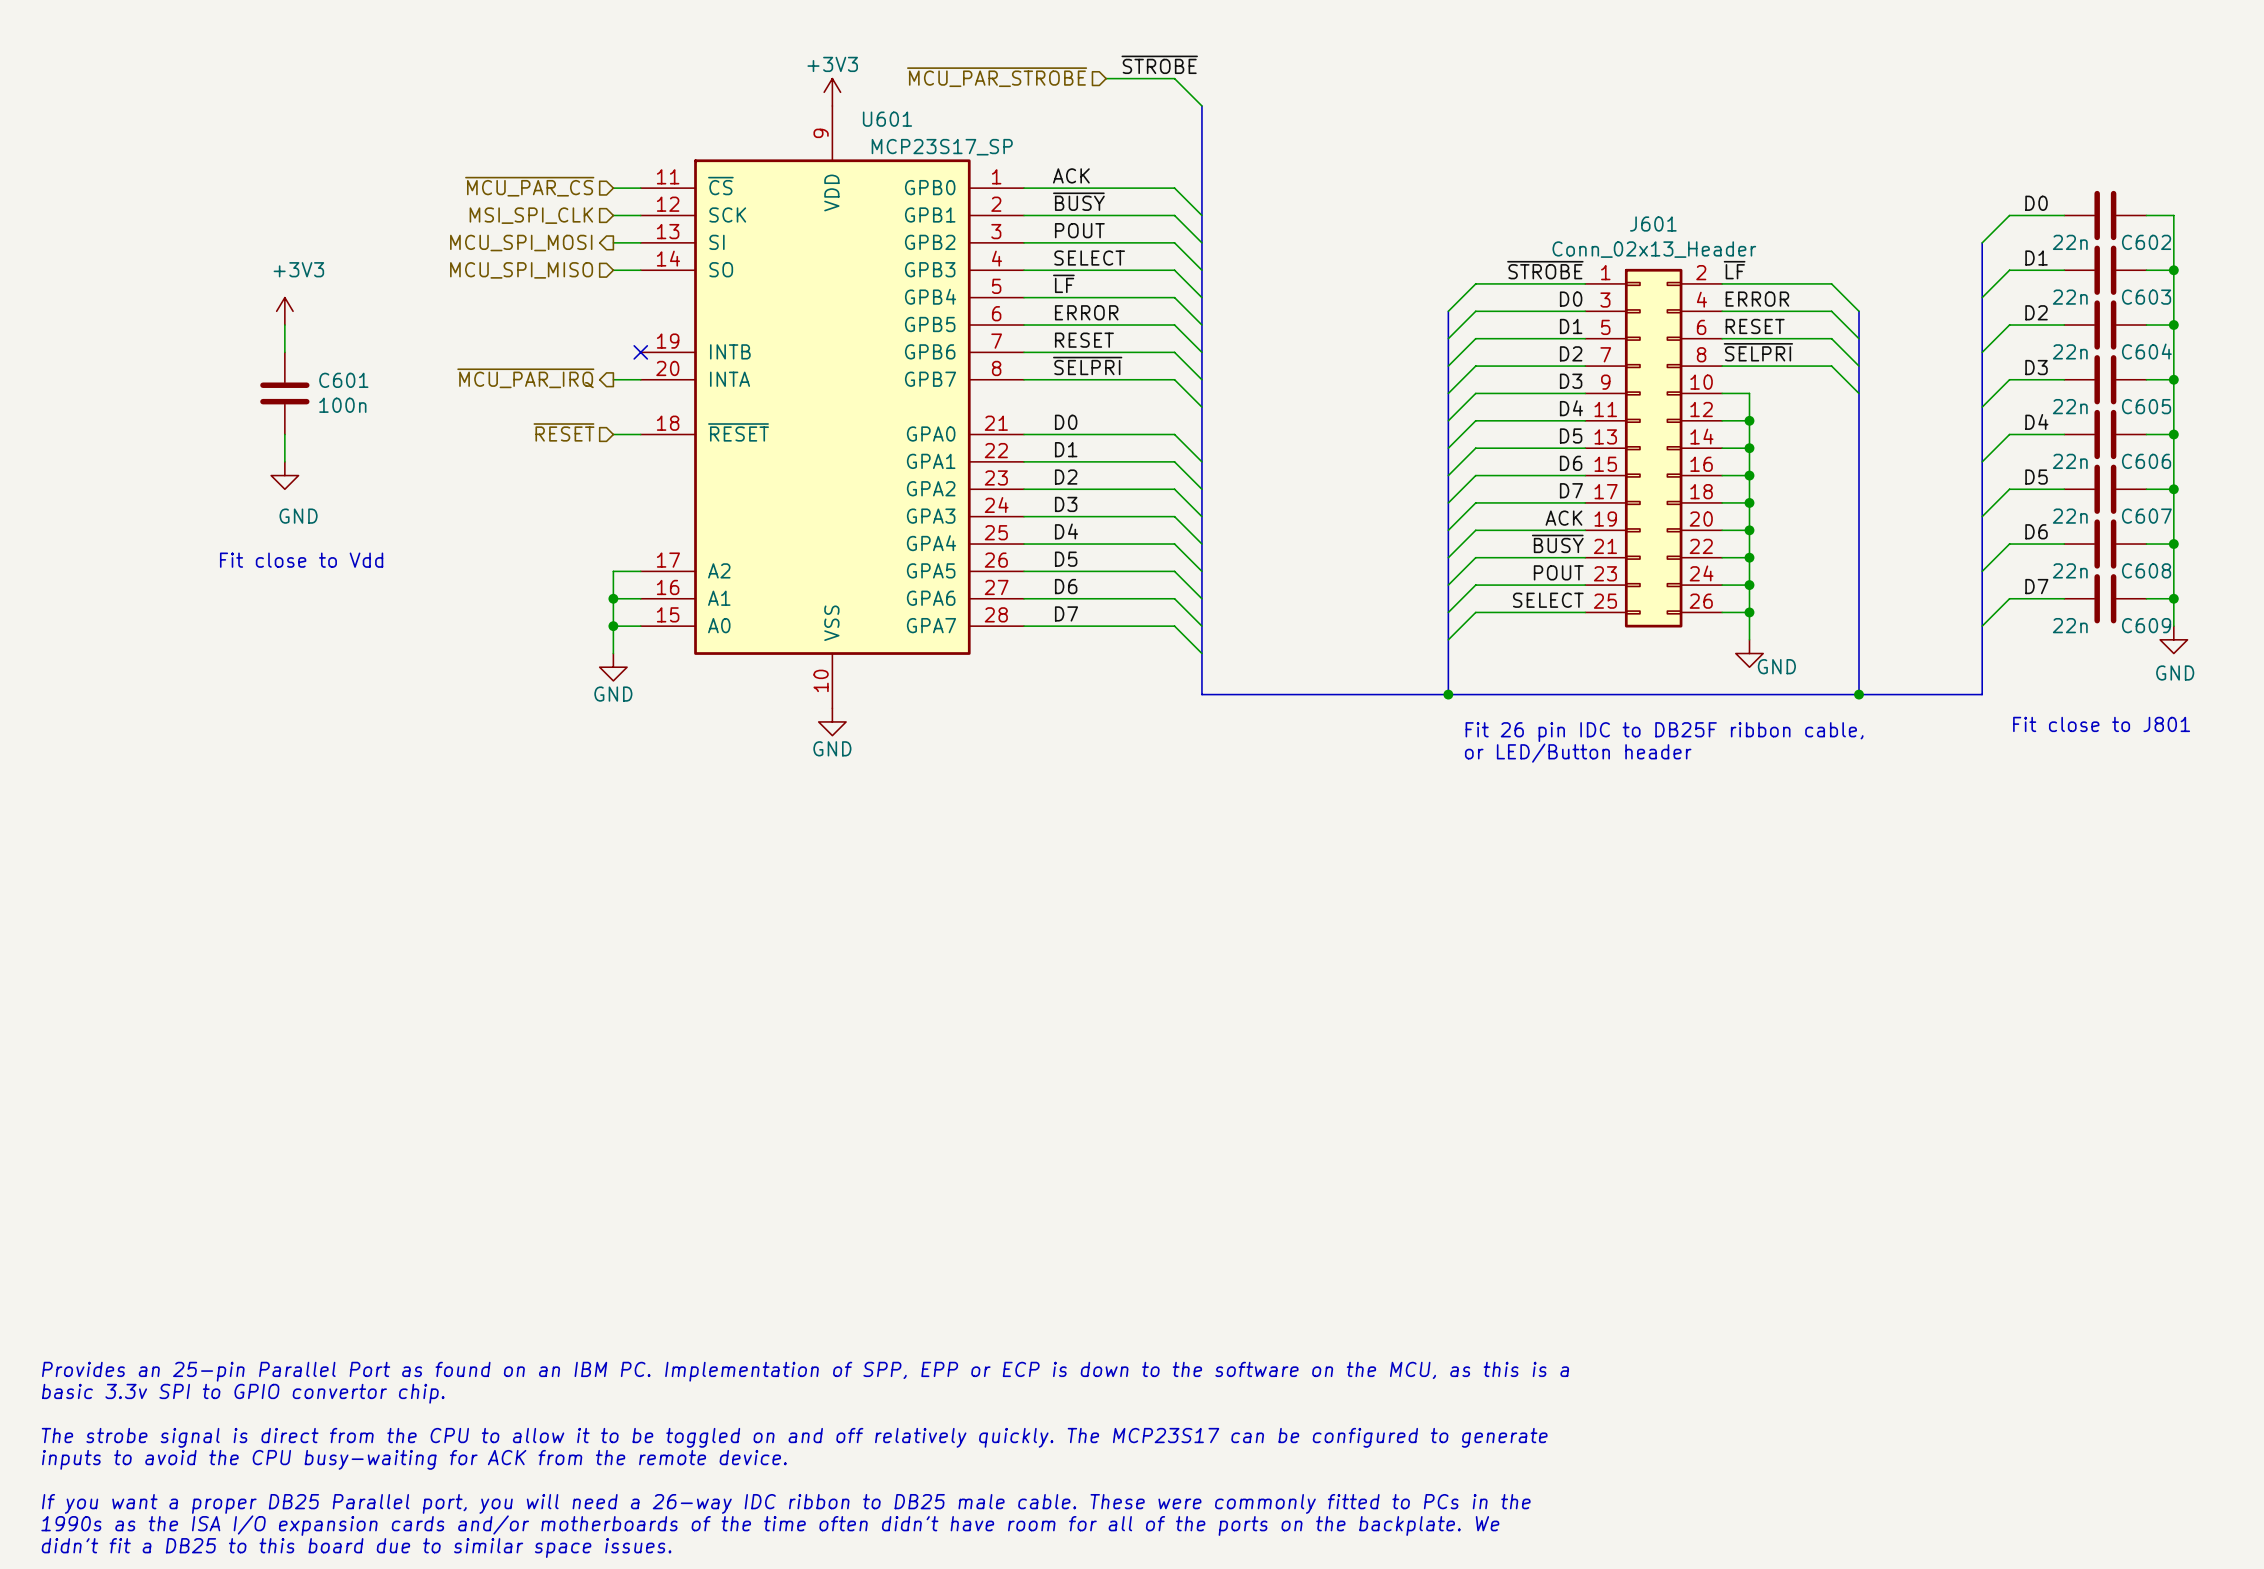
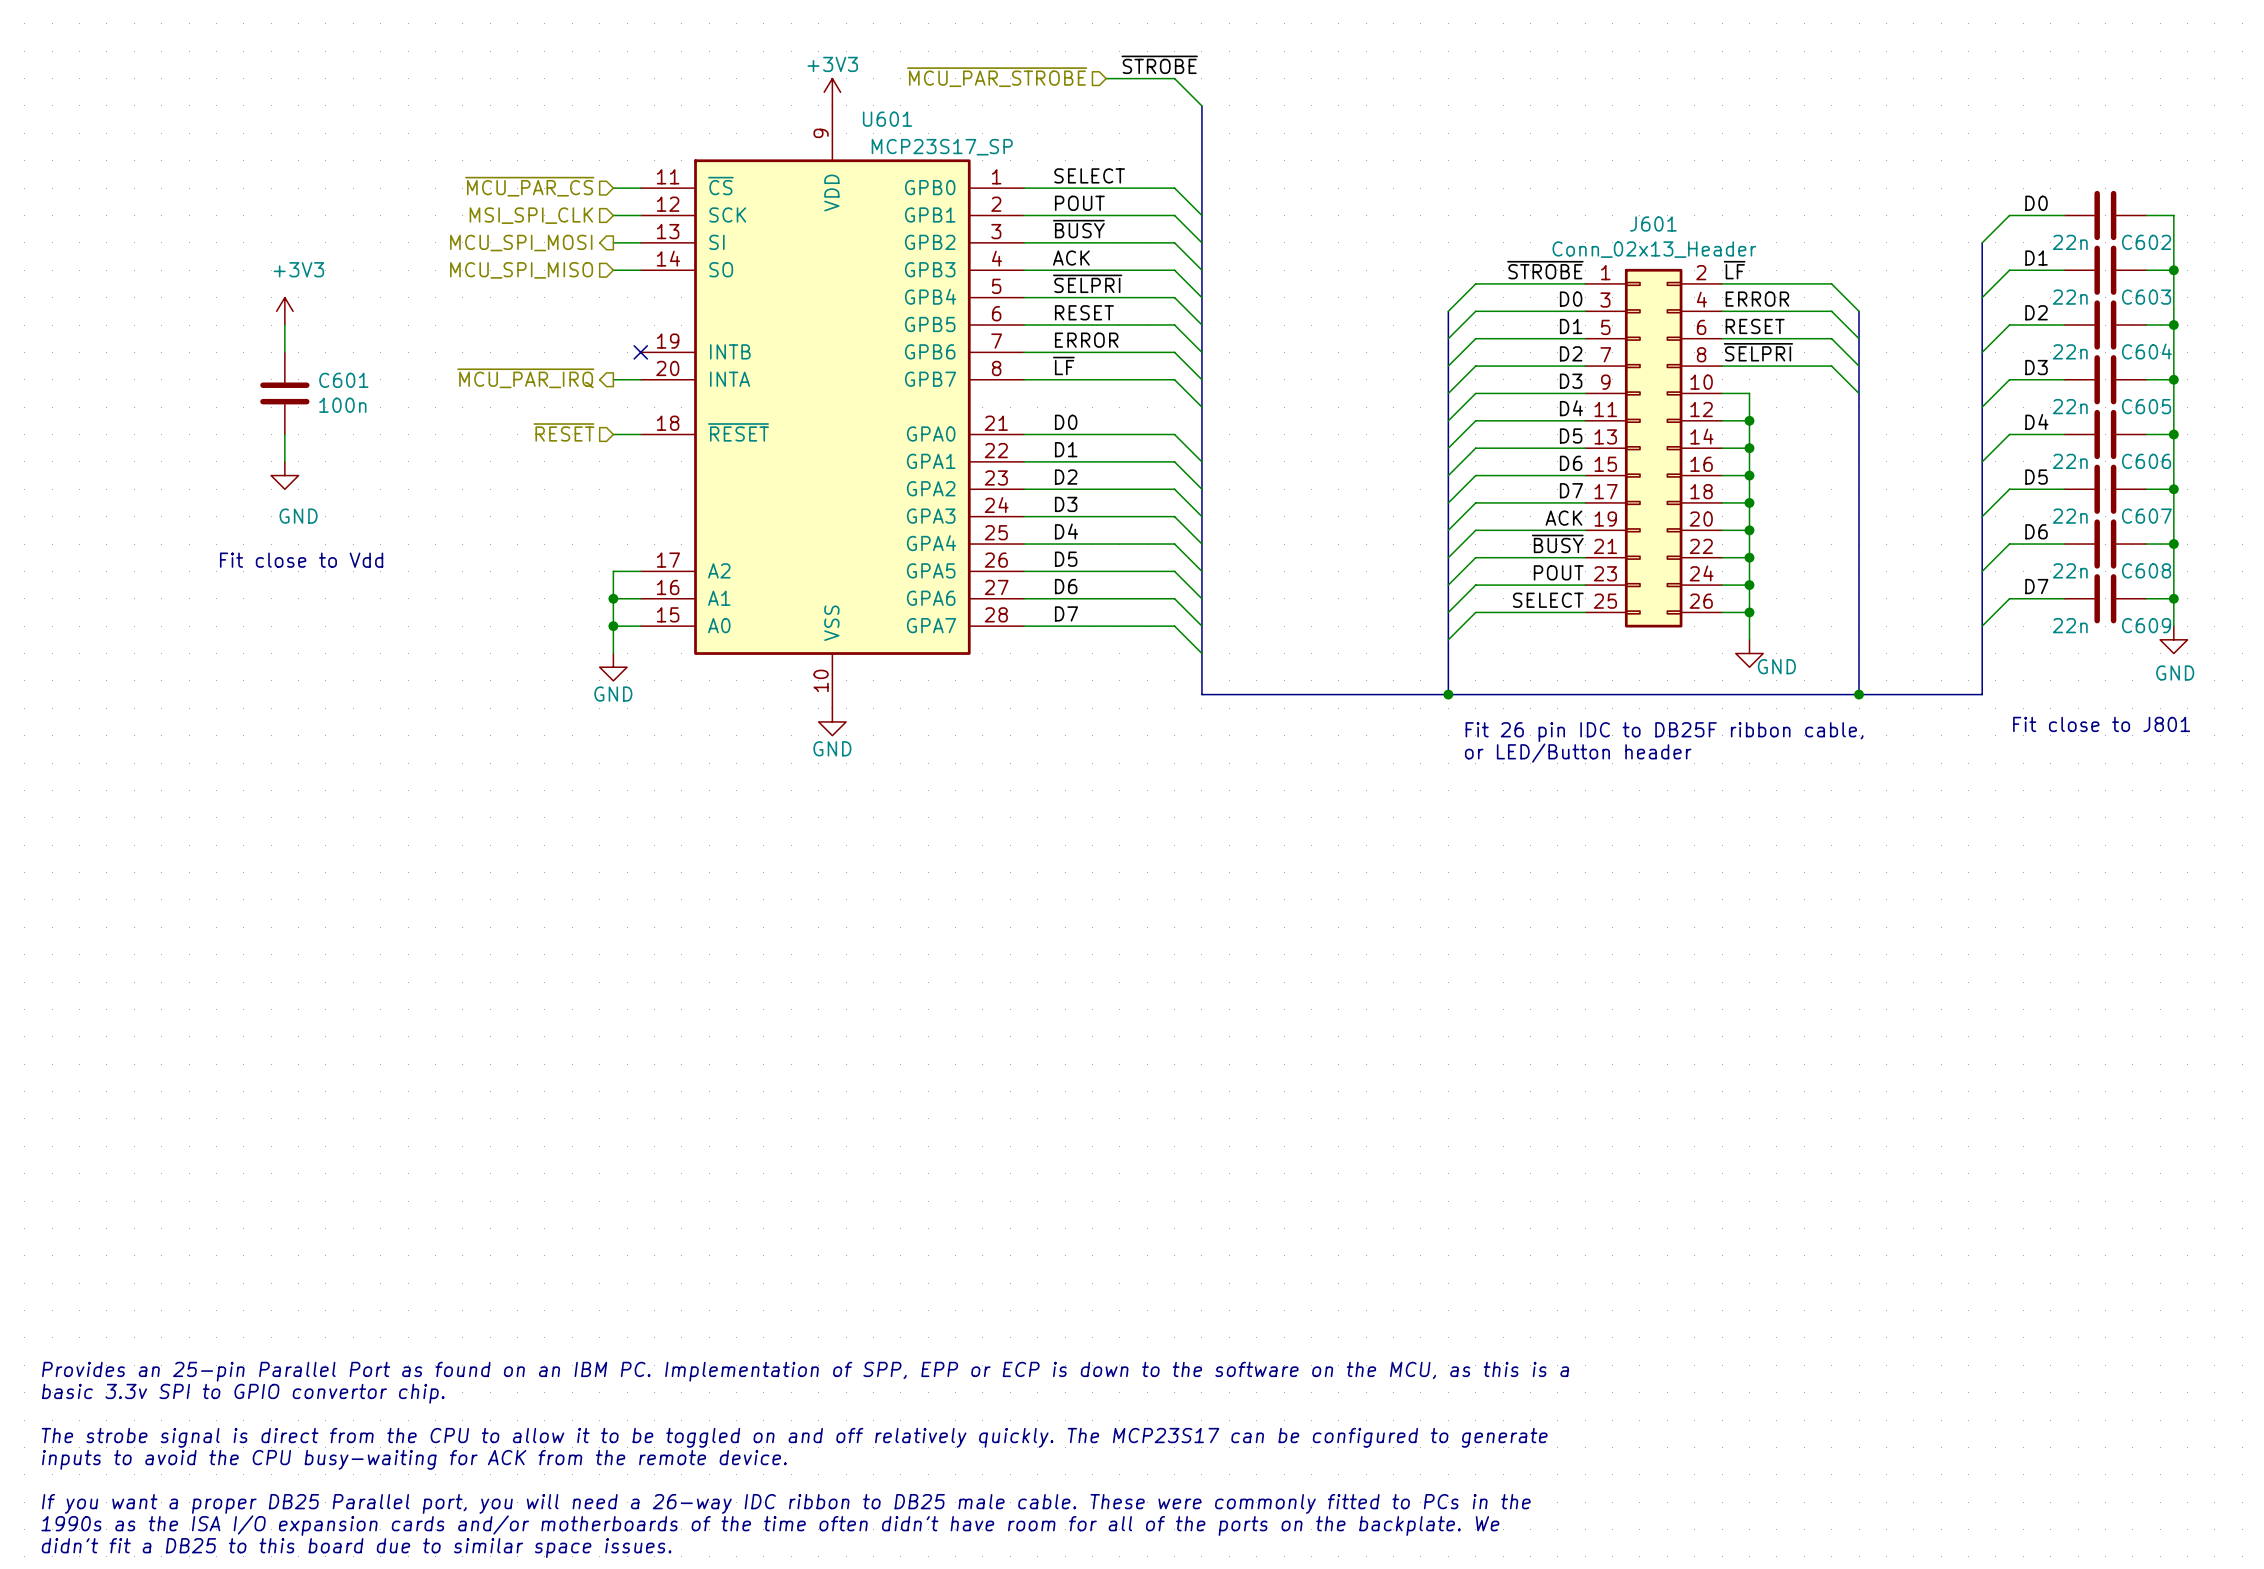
label: ACK (1071, 175) -> SELECT (1089, 175)
label: ~{BUSY} (1078, 201) -> POUT (1079, 203)
label: POUT (1079, 230) -> ~{BUSY} (1078, 229)
label: SELECT (1089, 258) -> ACK (1071, 258)
label: ~{LF} (1063, 283) -> ~{SELPRI} (1087, 283)
label: ERROR (1086, 312) -> RESET (1084, 312)
label: RESET (1084, 340) -> ERROR (1086, 340)
label: ~{SELPRI} (1087, 365) -> ~{LF} (1063, 365)

